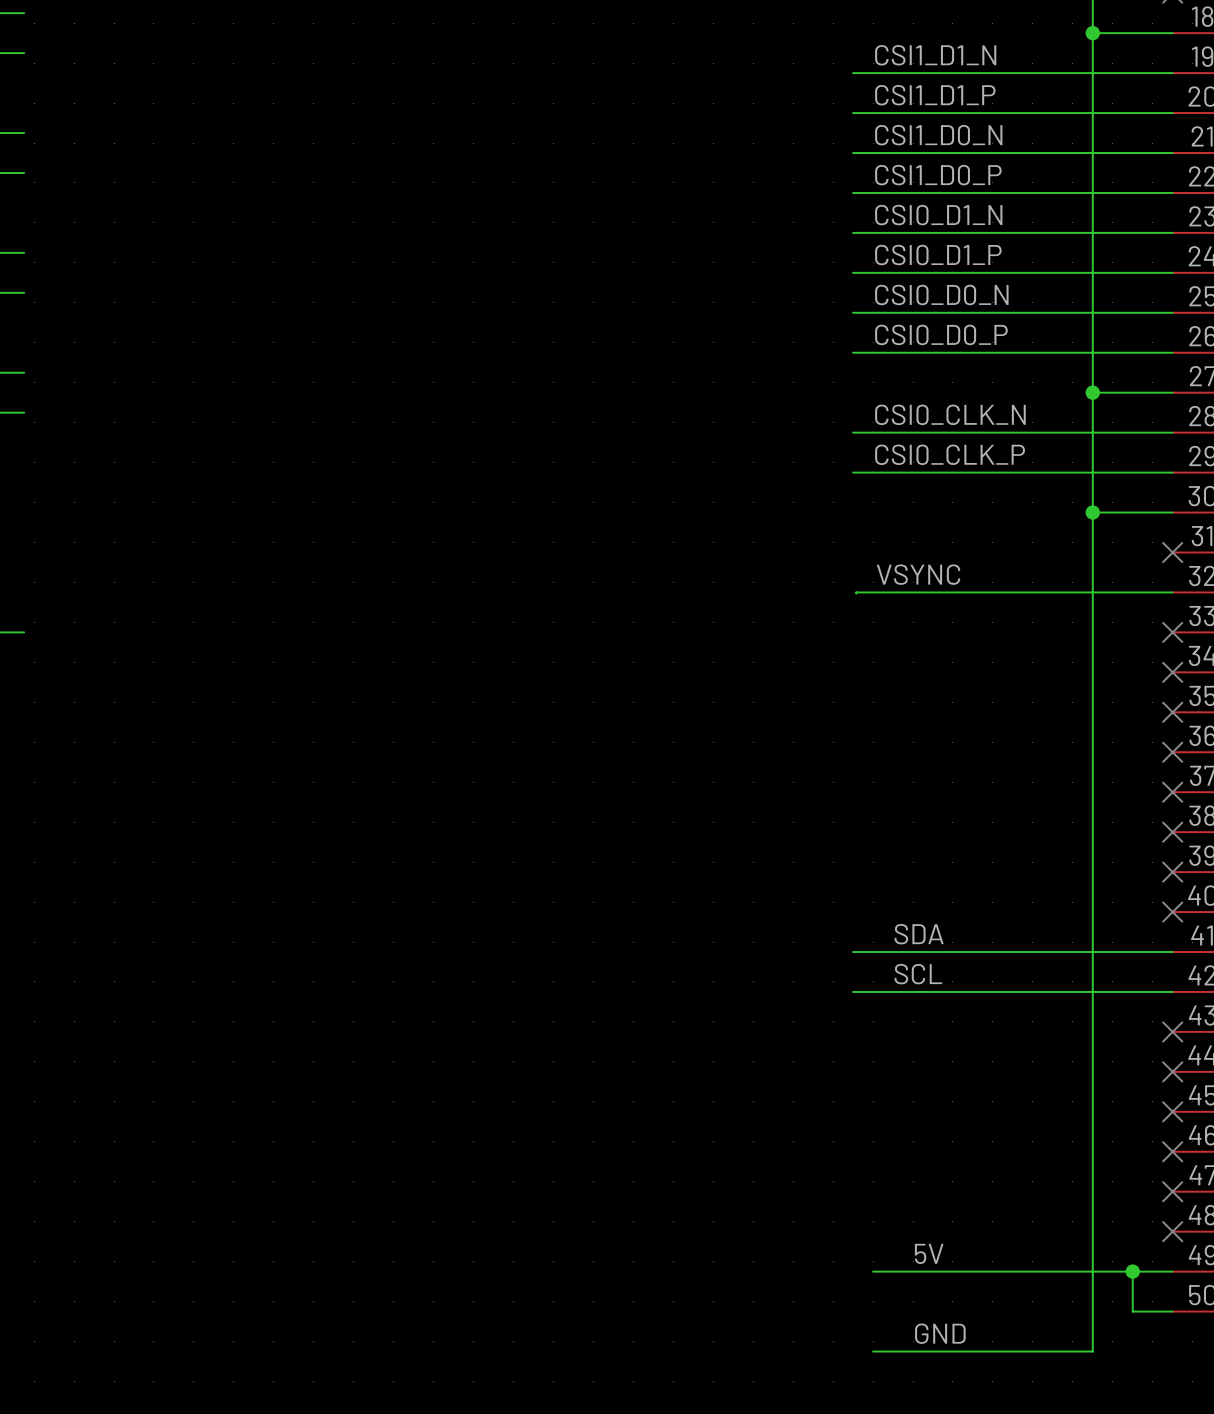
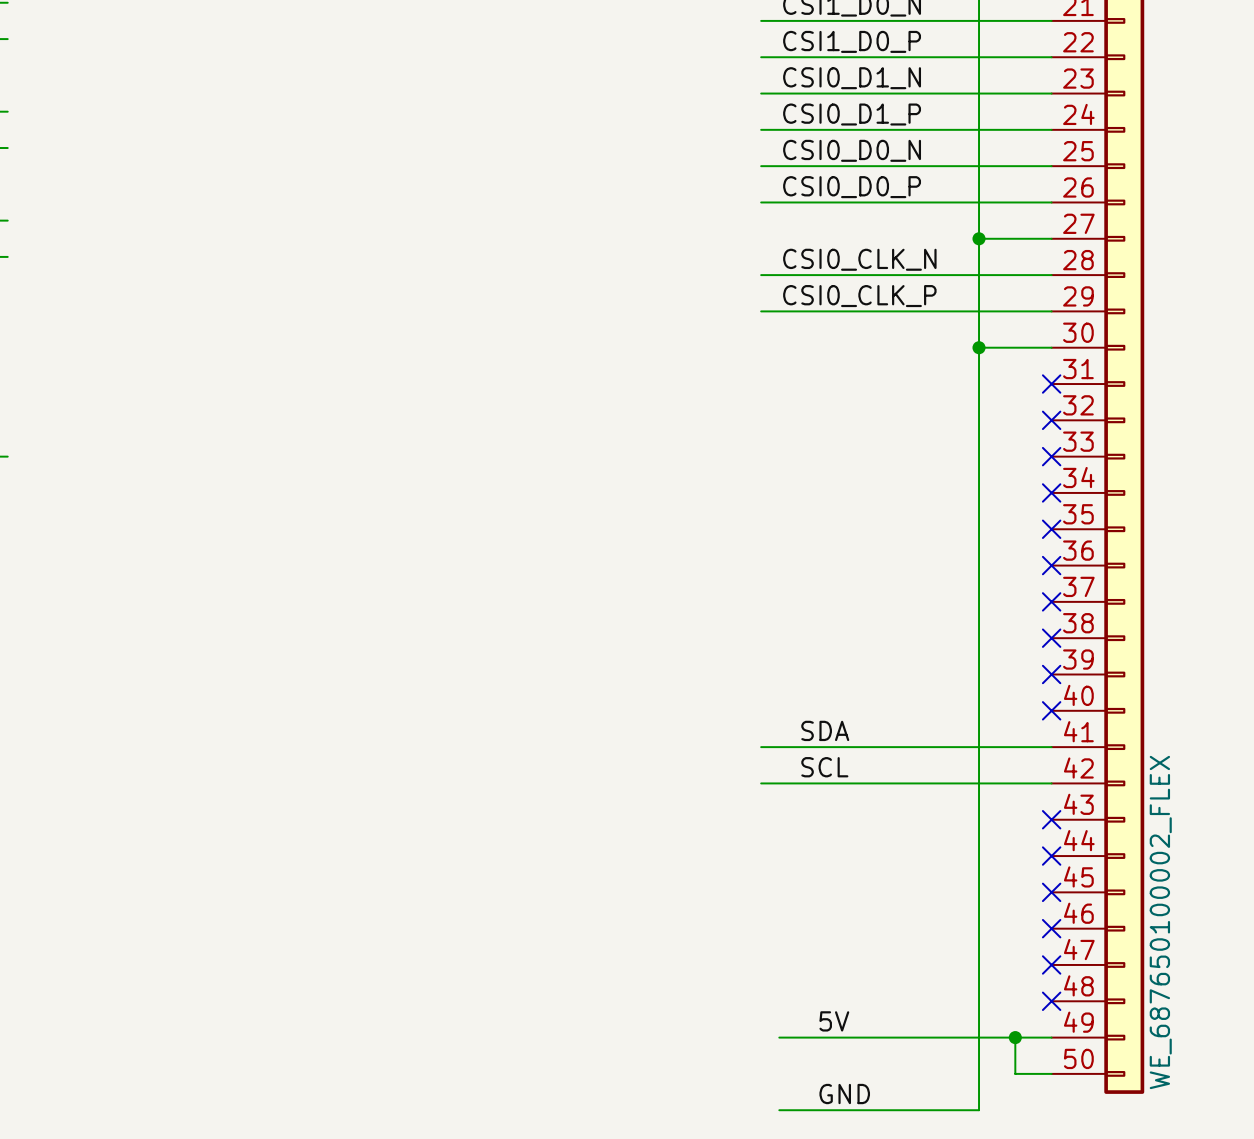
label: VSYNC (918, 574) -> none
wire: (1172, 592) (856, 593) -> none
no-connect mark: none -> (1051, 420)

